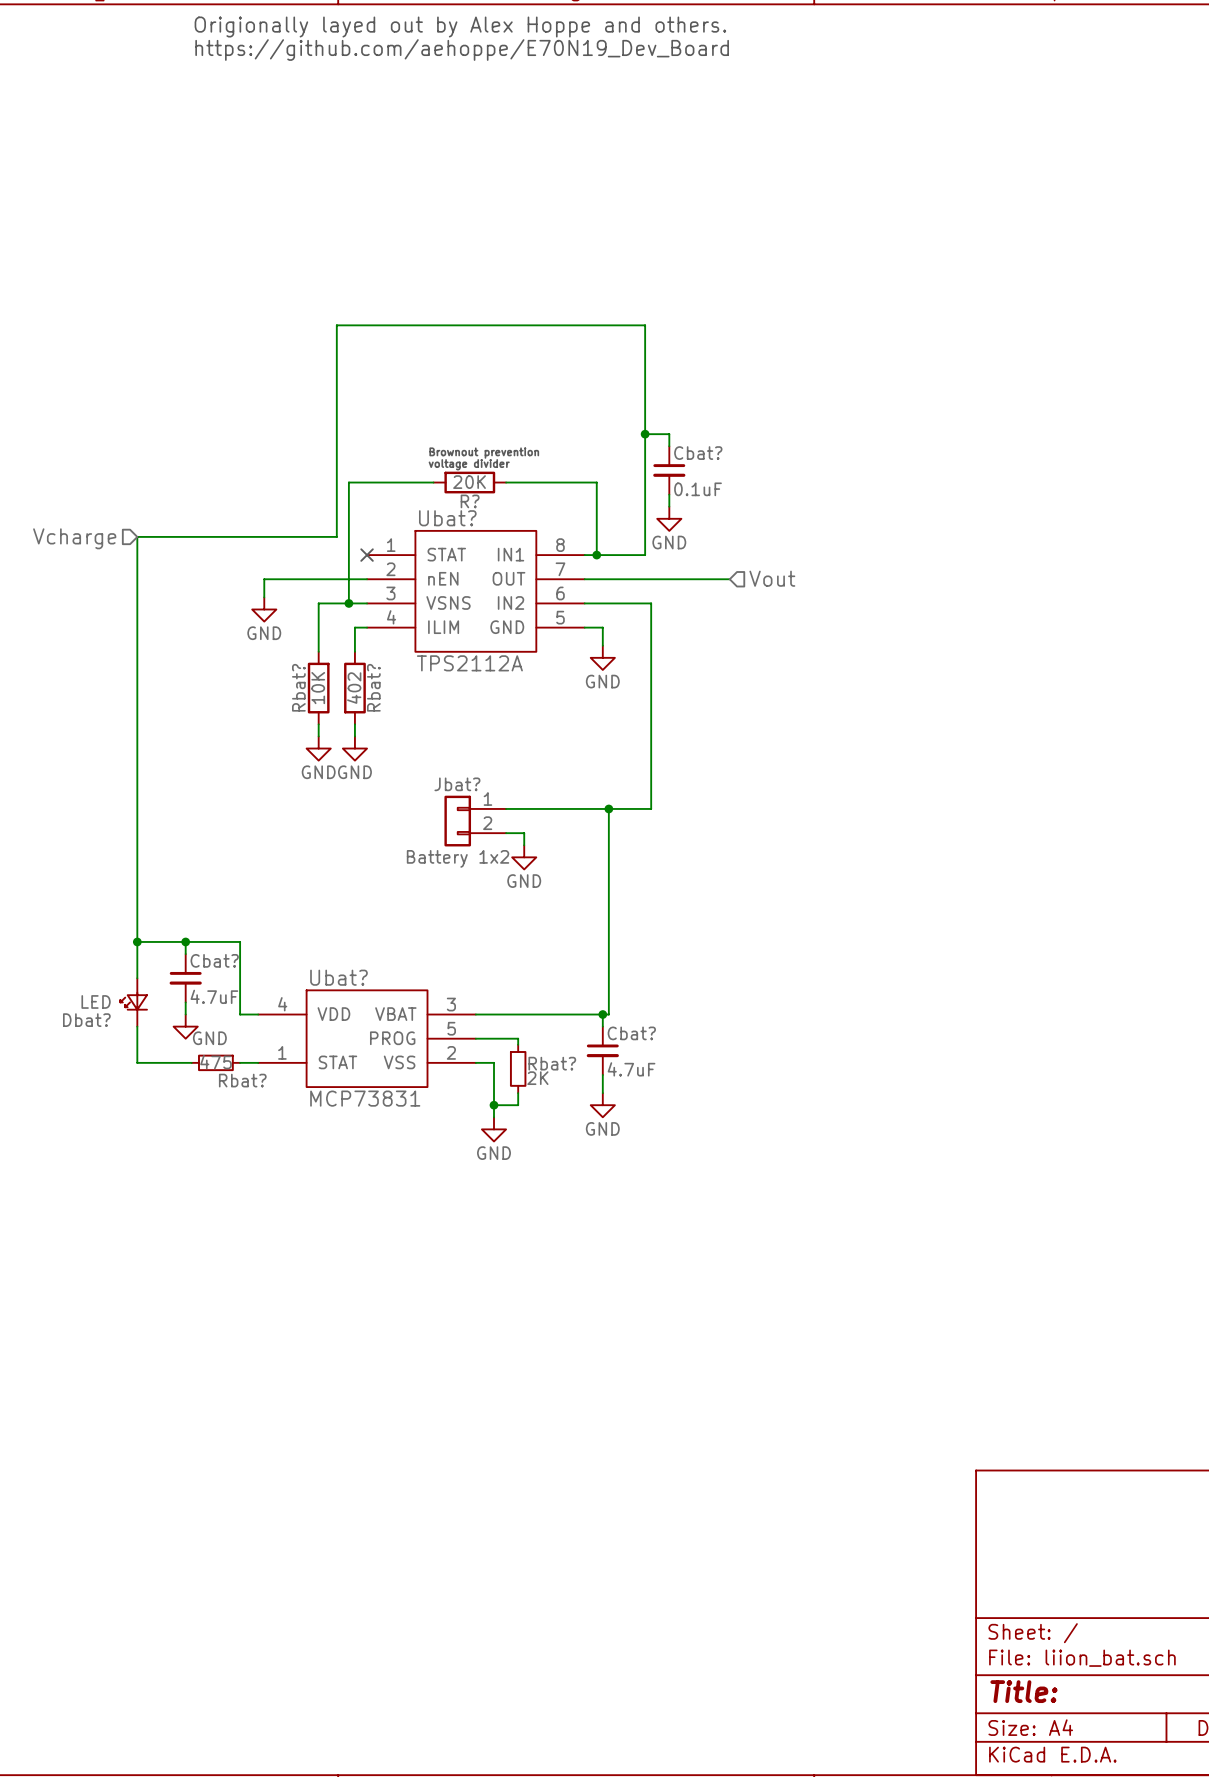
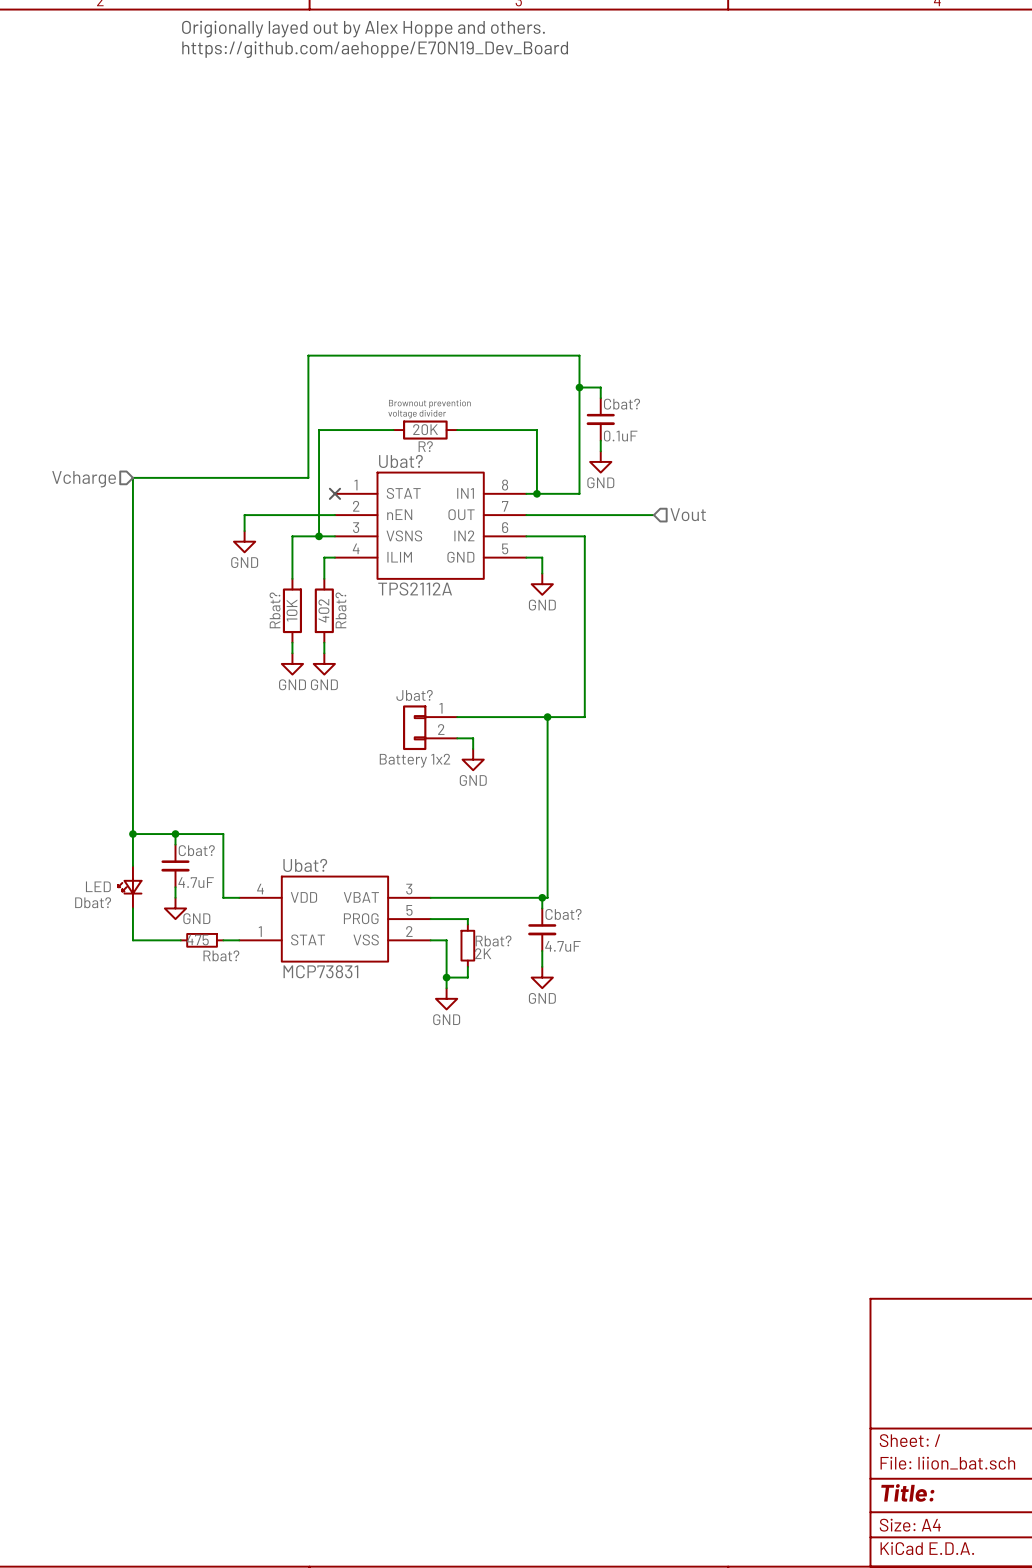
wire: (336, 397) (336, 325) (645, 325) (645, 397) -> (308, 355) (579, 355)

